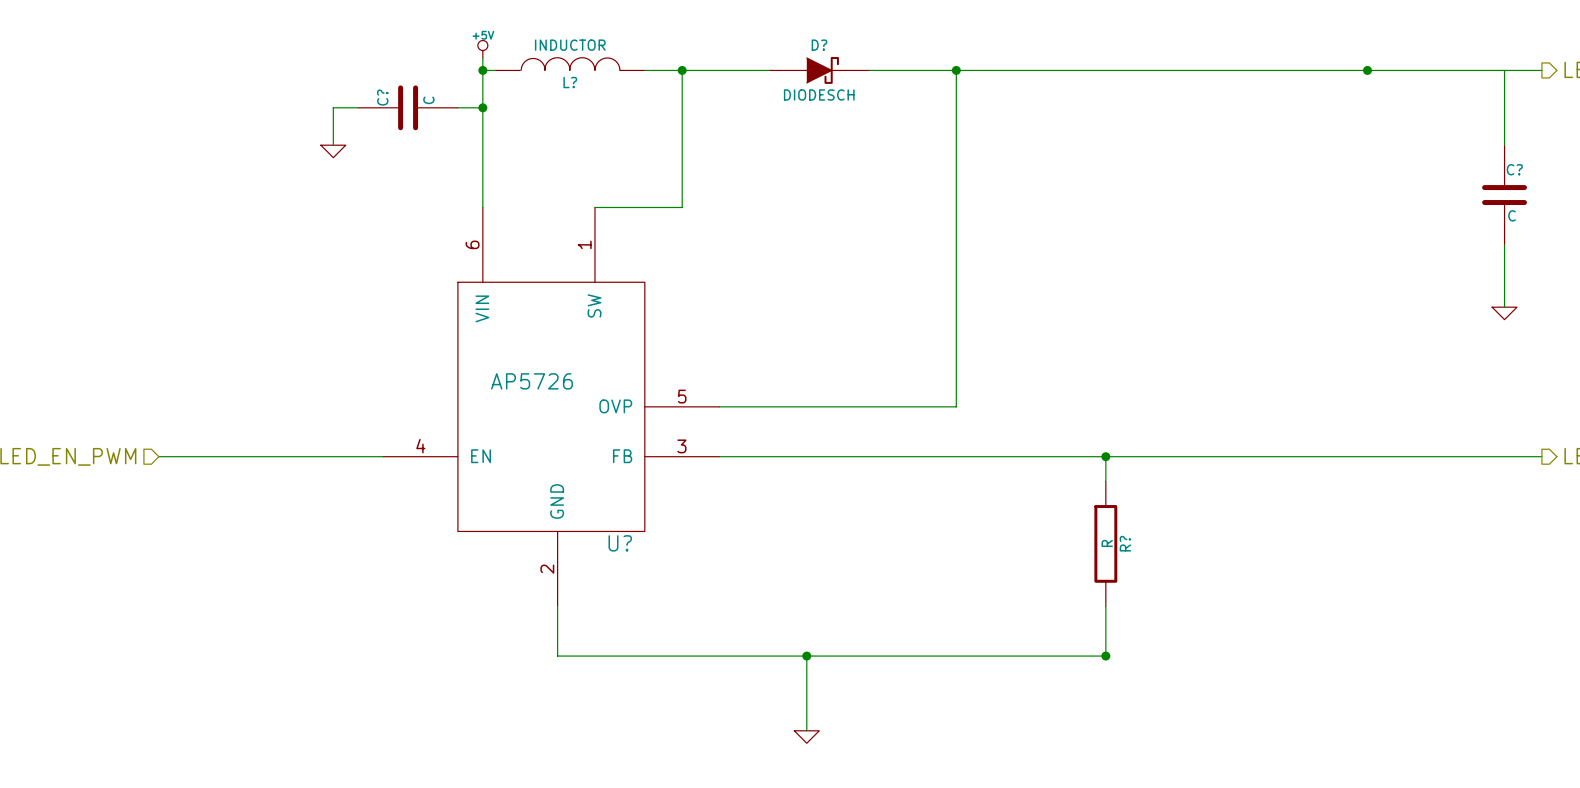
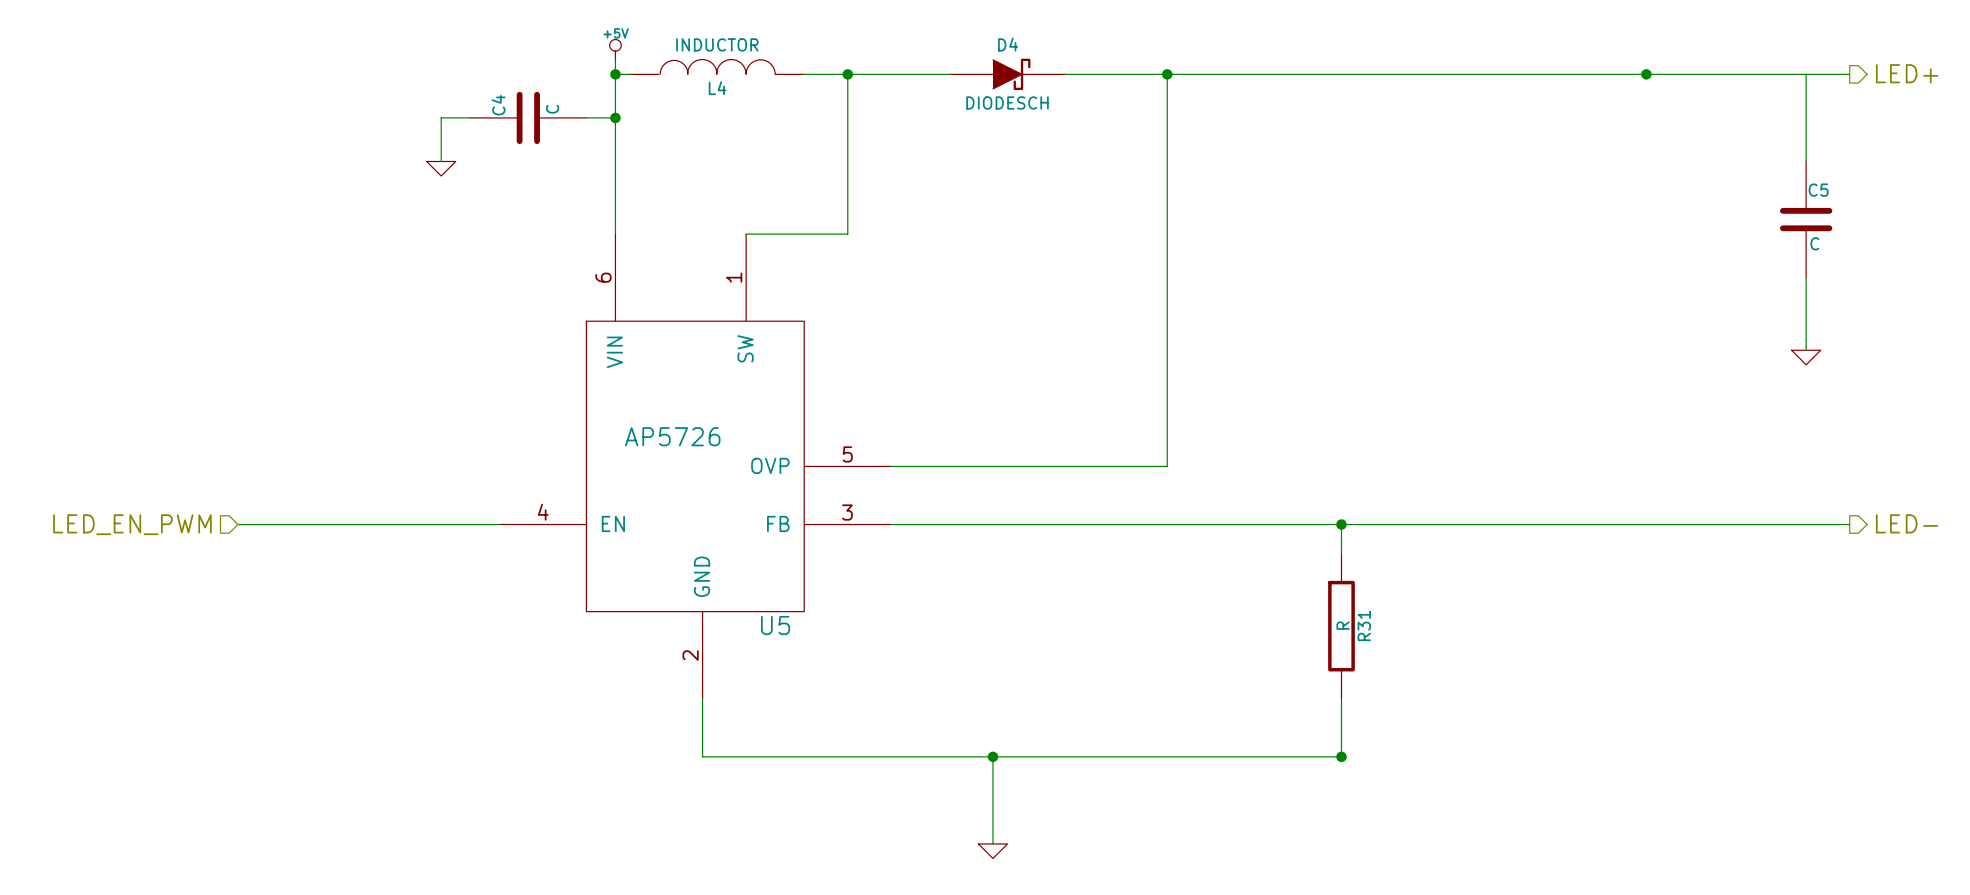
D? name: D? (819, 45) -> D4 (1008, 44)
L? name: L? (570, 82) -> L4 (717, 88)
C? name: C? (382, 97) -> C4 (498, 105)
C? name: C? (1514, 169) -> C5 (1818, 190)
U? name: U? (620, 543) -> U5 (775, 625)
R? name: R? (1125, 543) -> R31 (1364, 625)

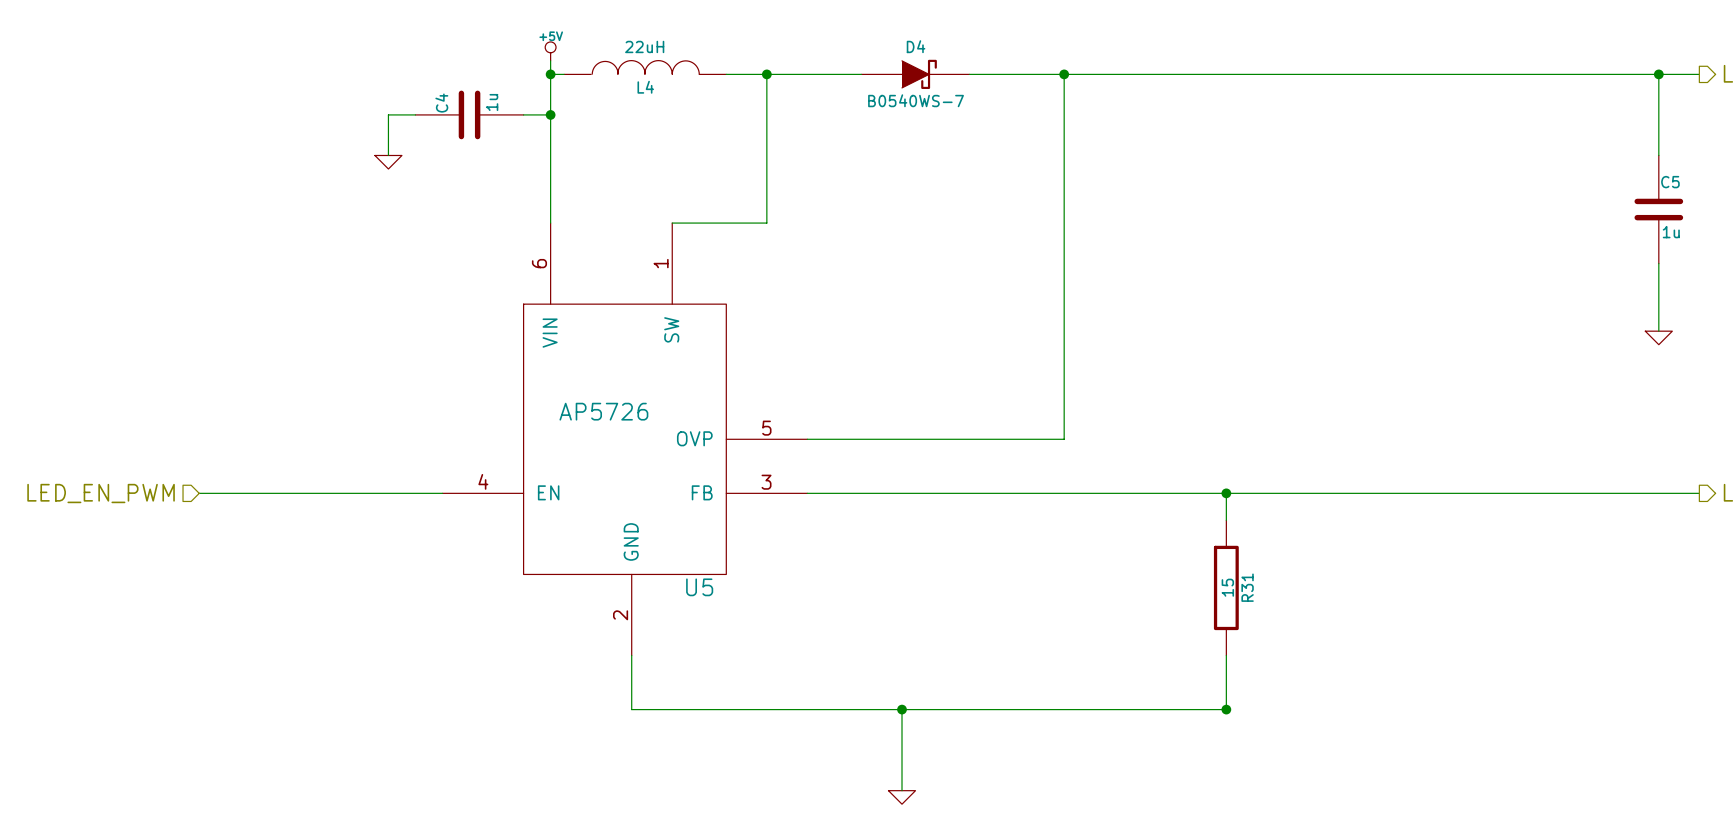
L4 value: INDUCTOR (717, 44) -> 22uH (644, 46)
junction: (1646, 74) -> none
junction: none -> (1658, 74)
D4 value: DIODESCH (1007, 102) -> B0540WS-7 (916, 100)
C4 value: C (552, 109) -> 1u (492, 102)
C5 value: C (1814, 243) -> 1u (1671, 232)
R31 value: R (1343, 625) -> 15 (1227, 587)

